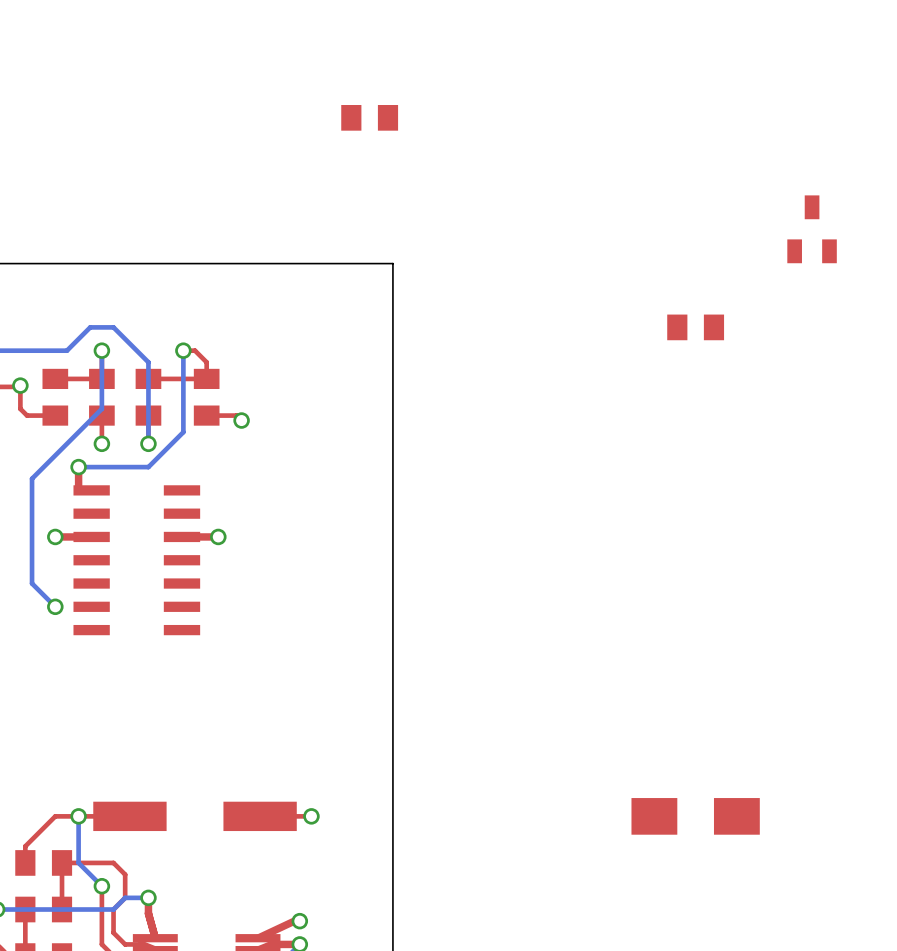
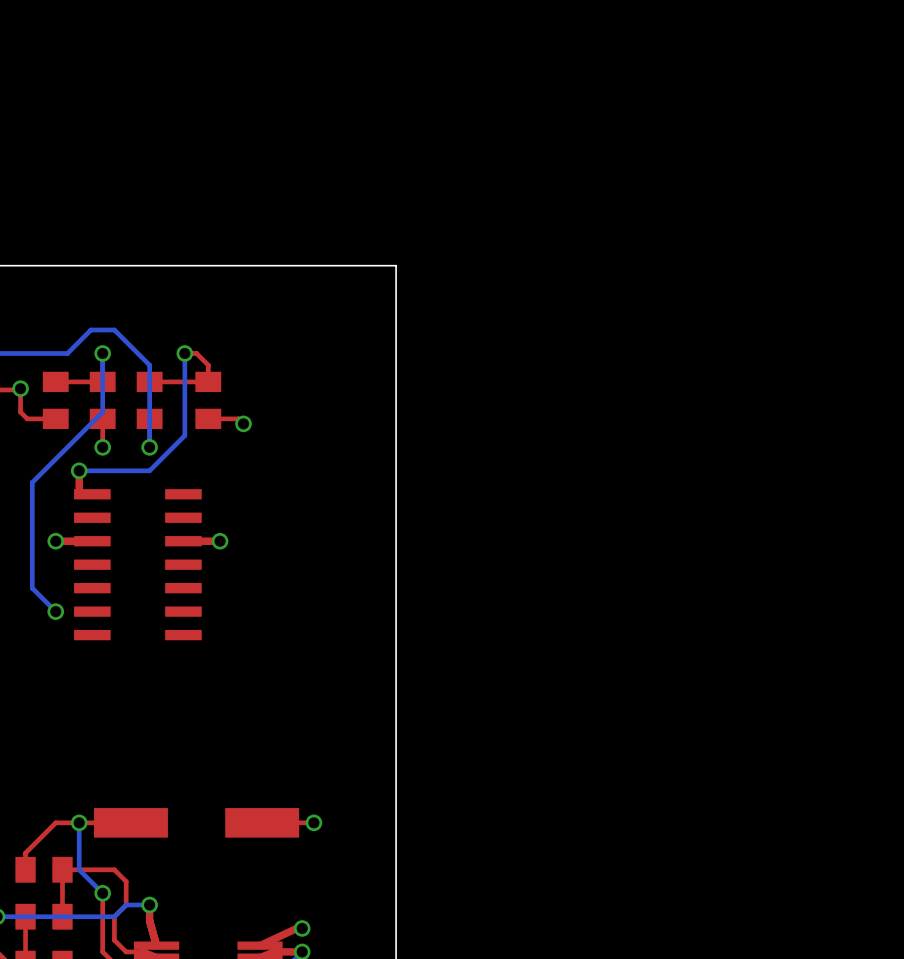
part: (369, 117) -> none
part: (812, 229) -> none
part: (695, 327) -> none
part: (695, 816) -> none

